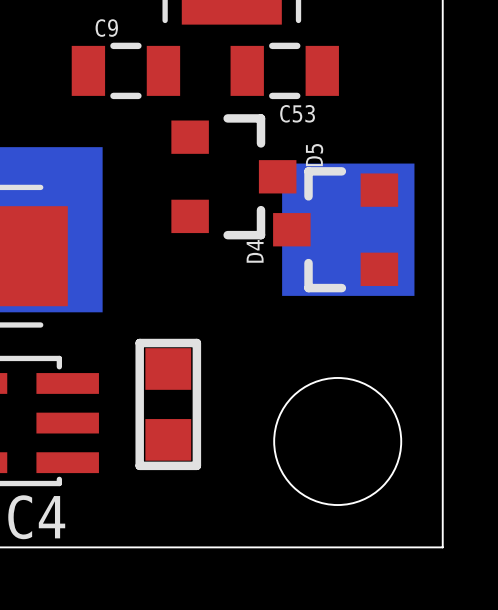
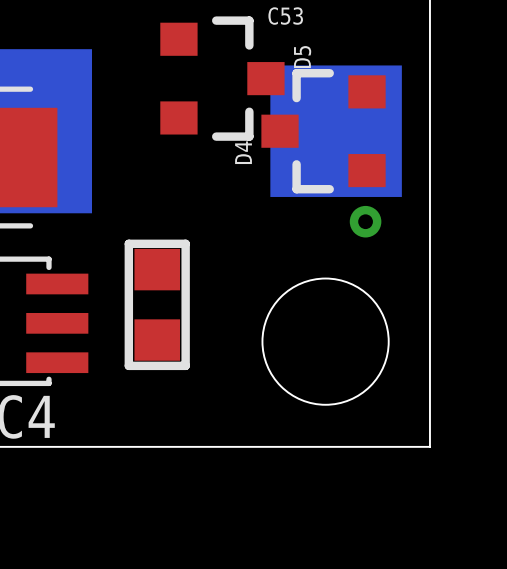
via: none -> (365, 221)

